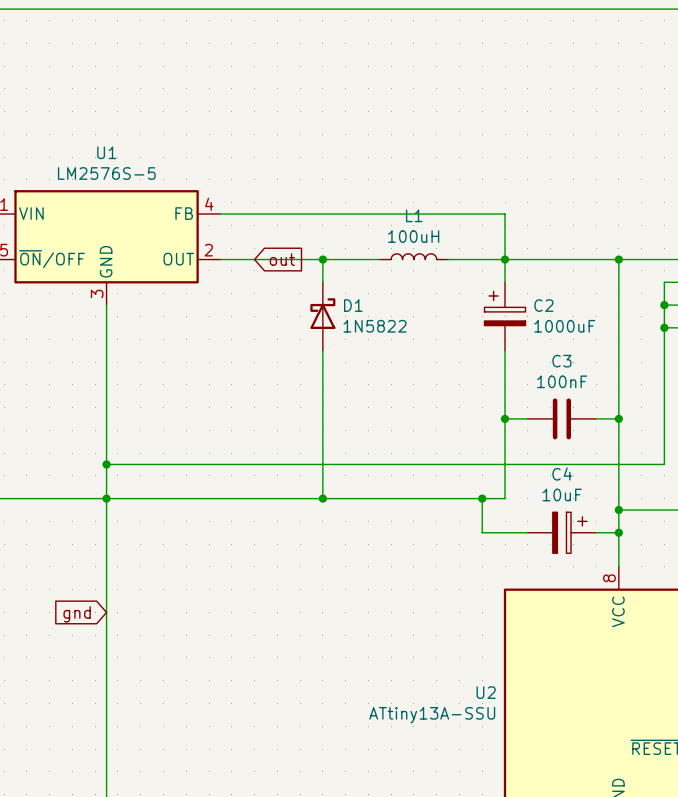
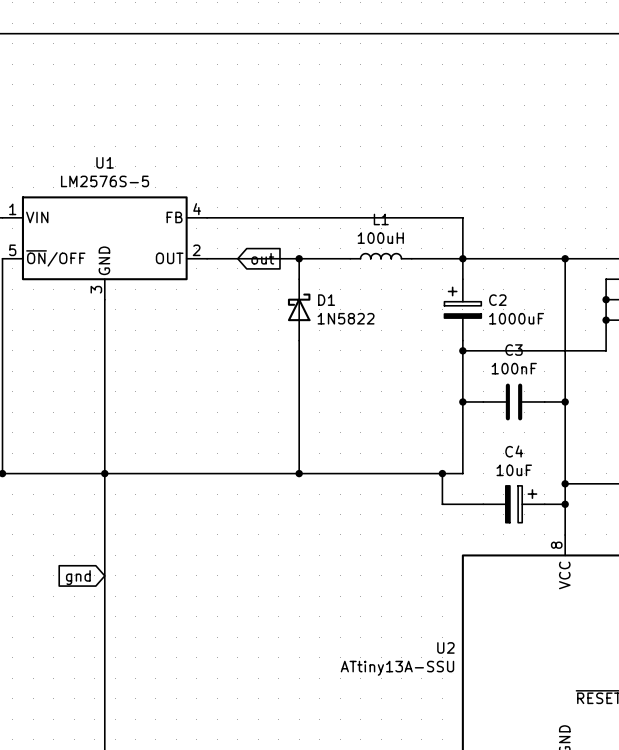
junction: none -> (462, 350)
wire: (664, 362) (664, 464) (106, 464) -> (606, 350) (462, 350)
junction: (106, 464) -> none

